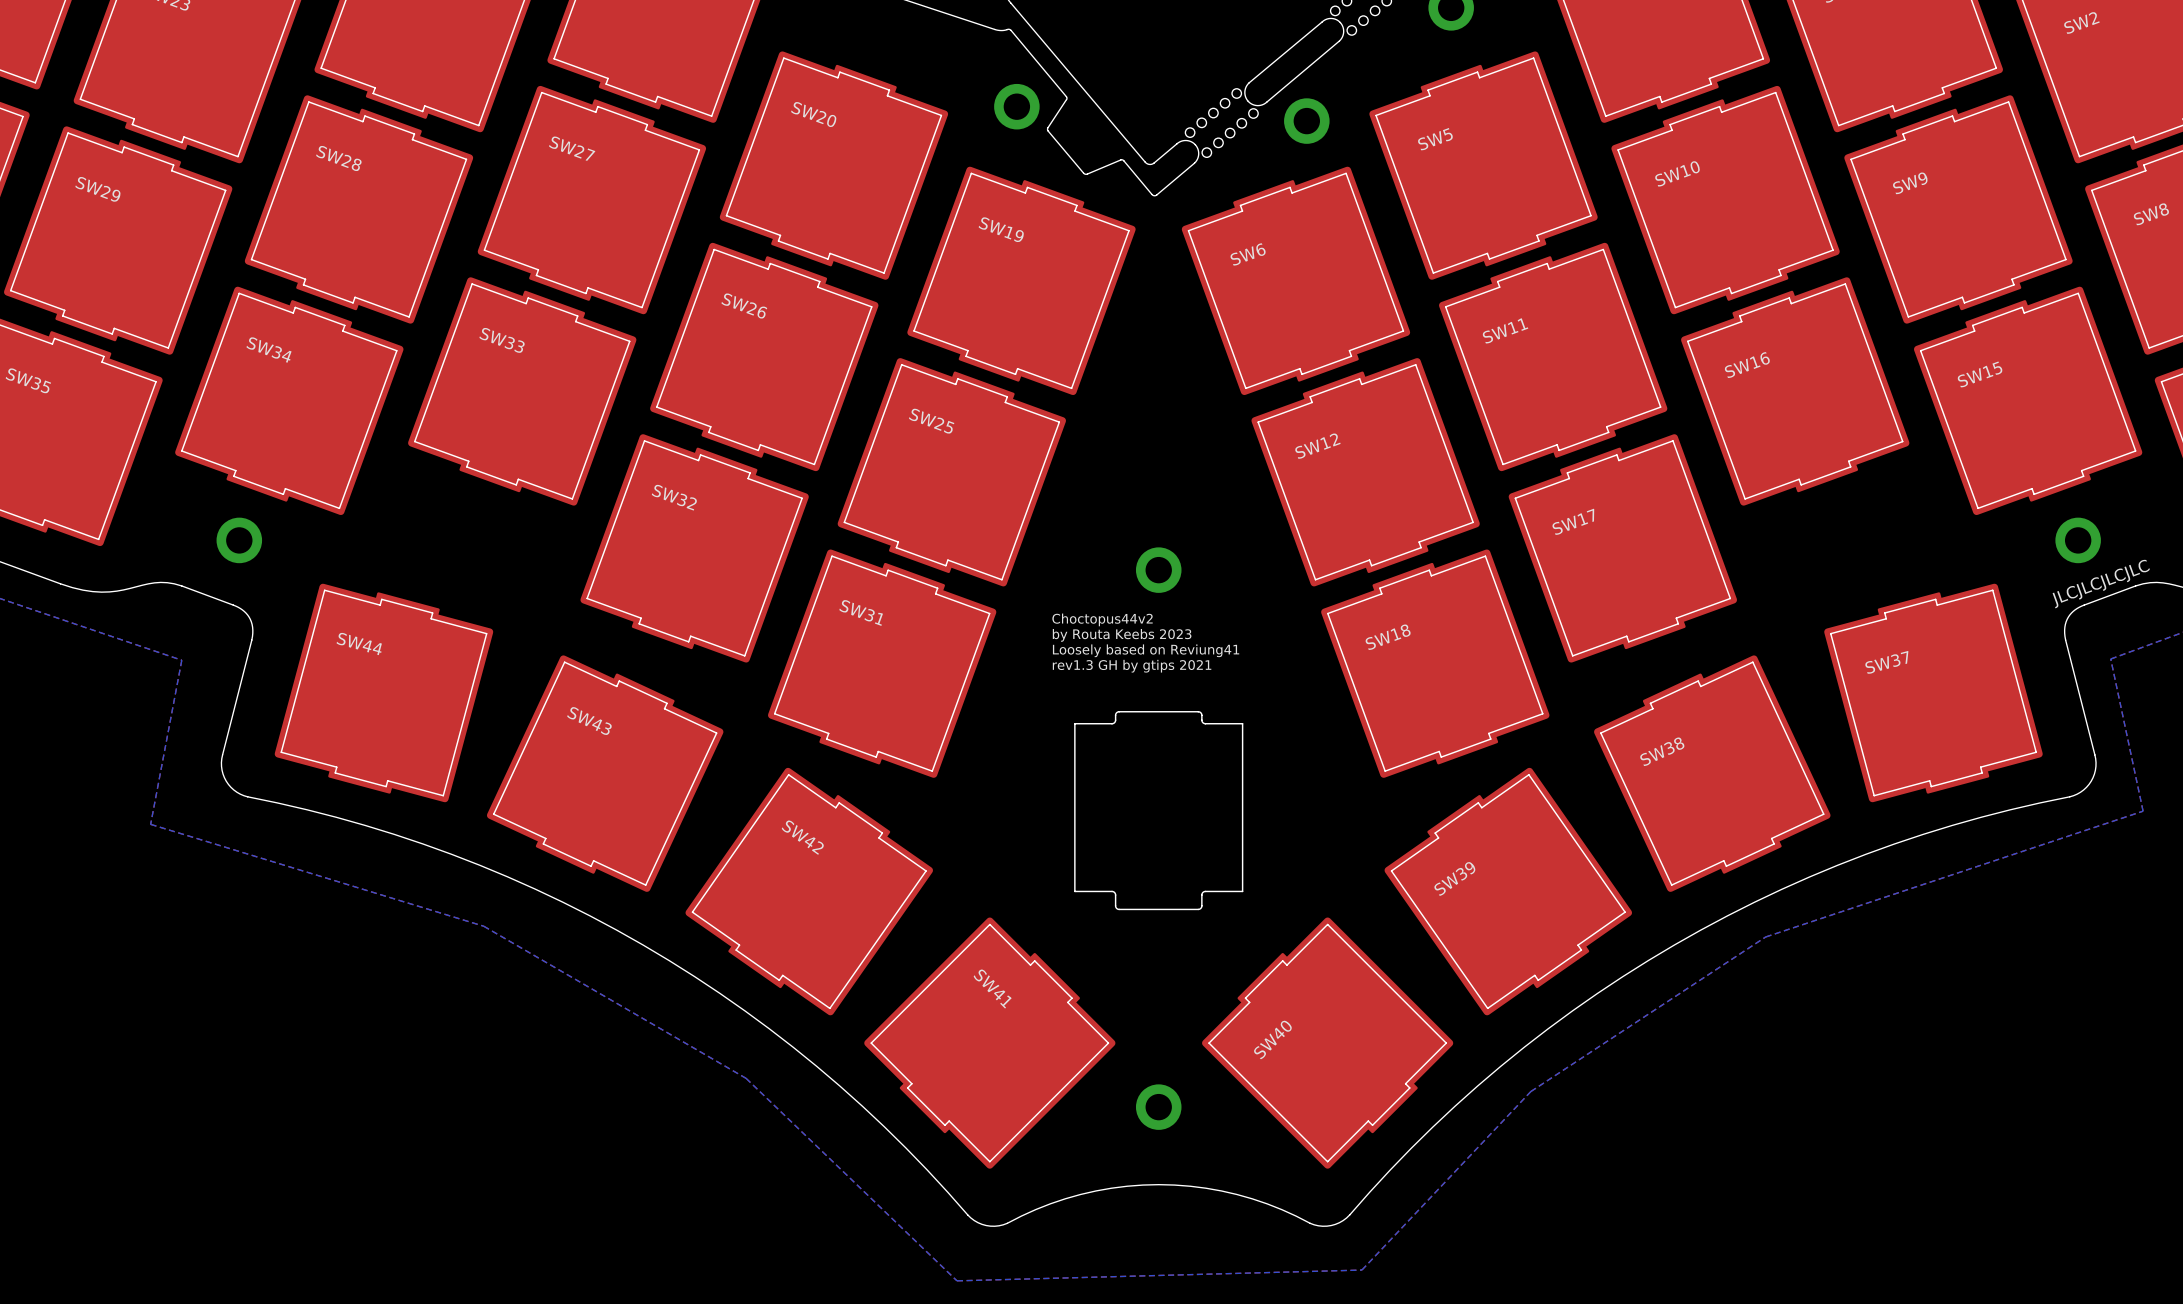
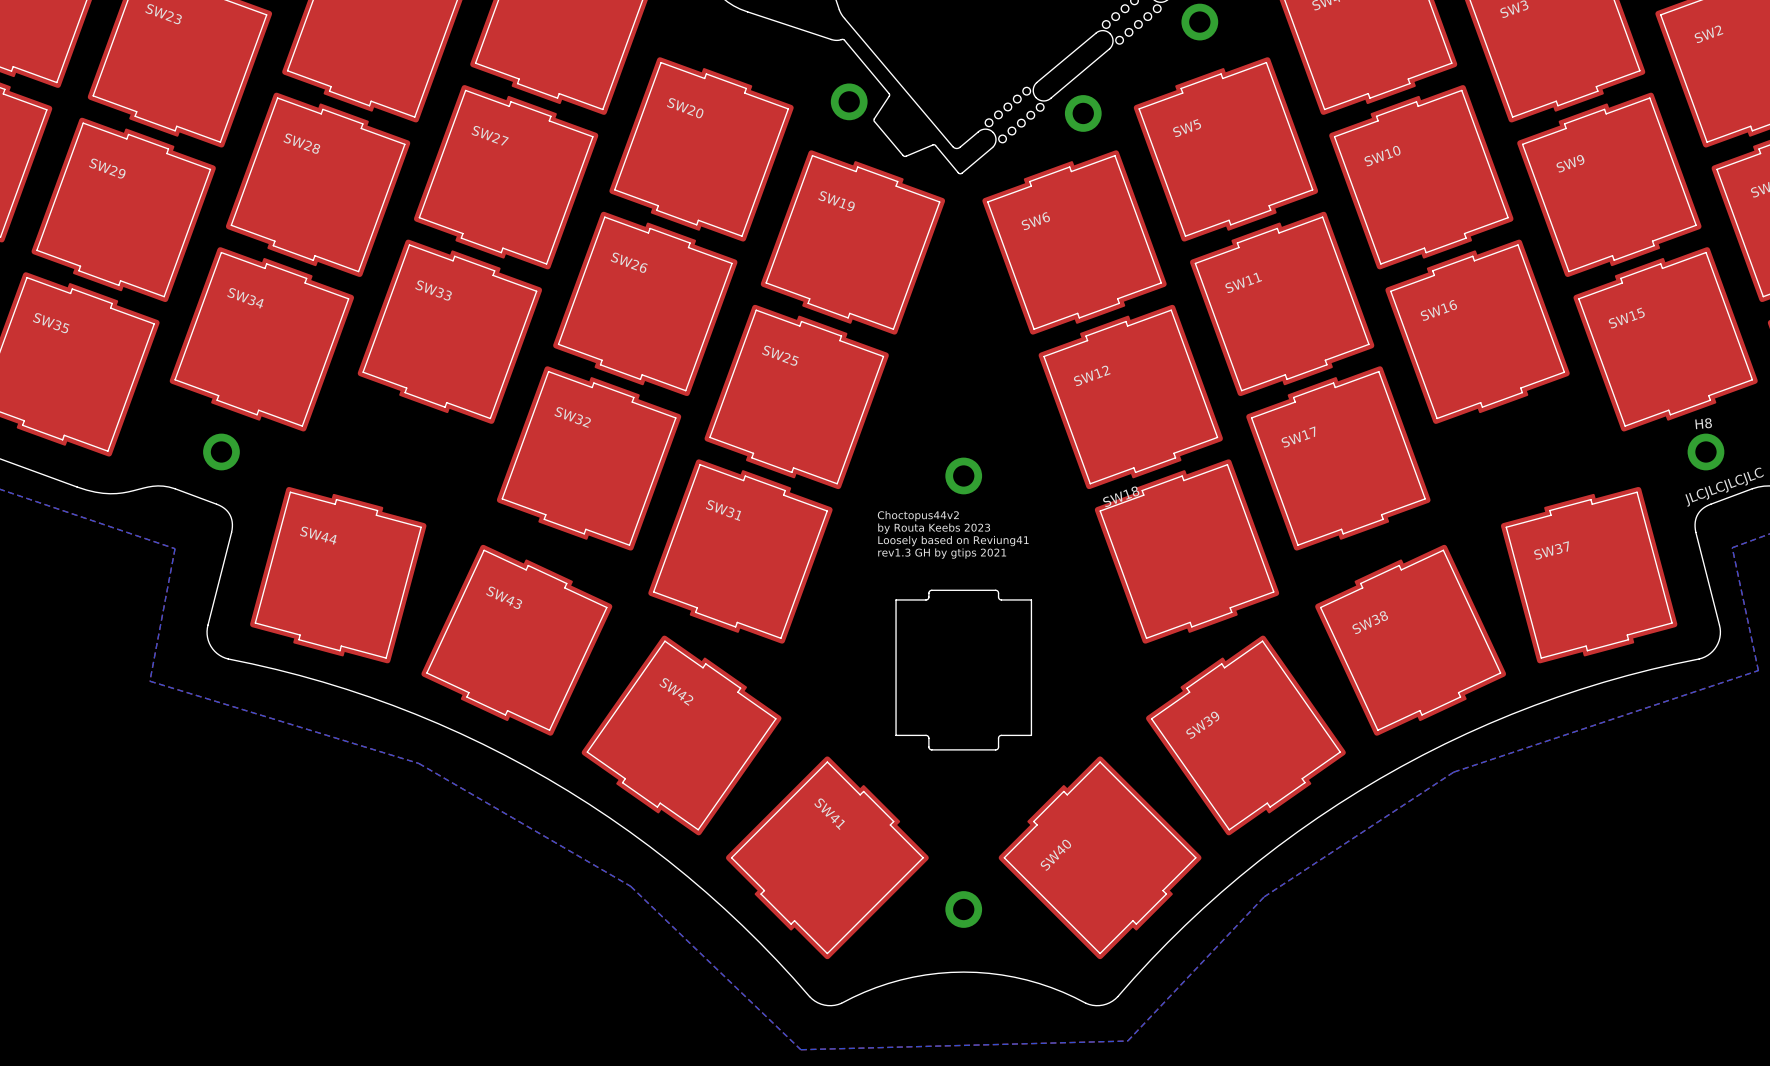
H8 name: none -> H8 (1703, 423)
SW18 name position: SW18 (1388, 637) -> SW18 (1121, 496)

